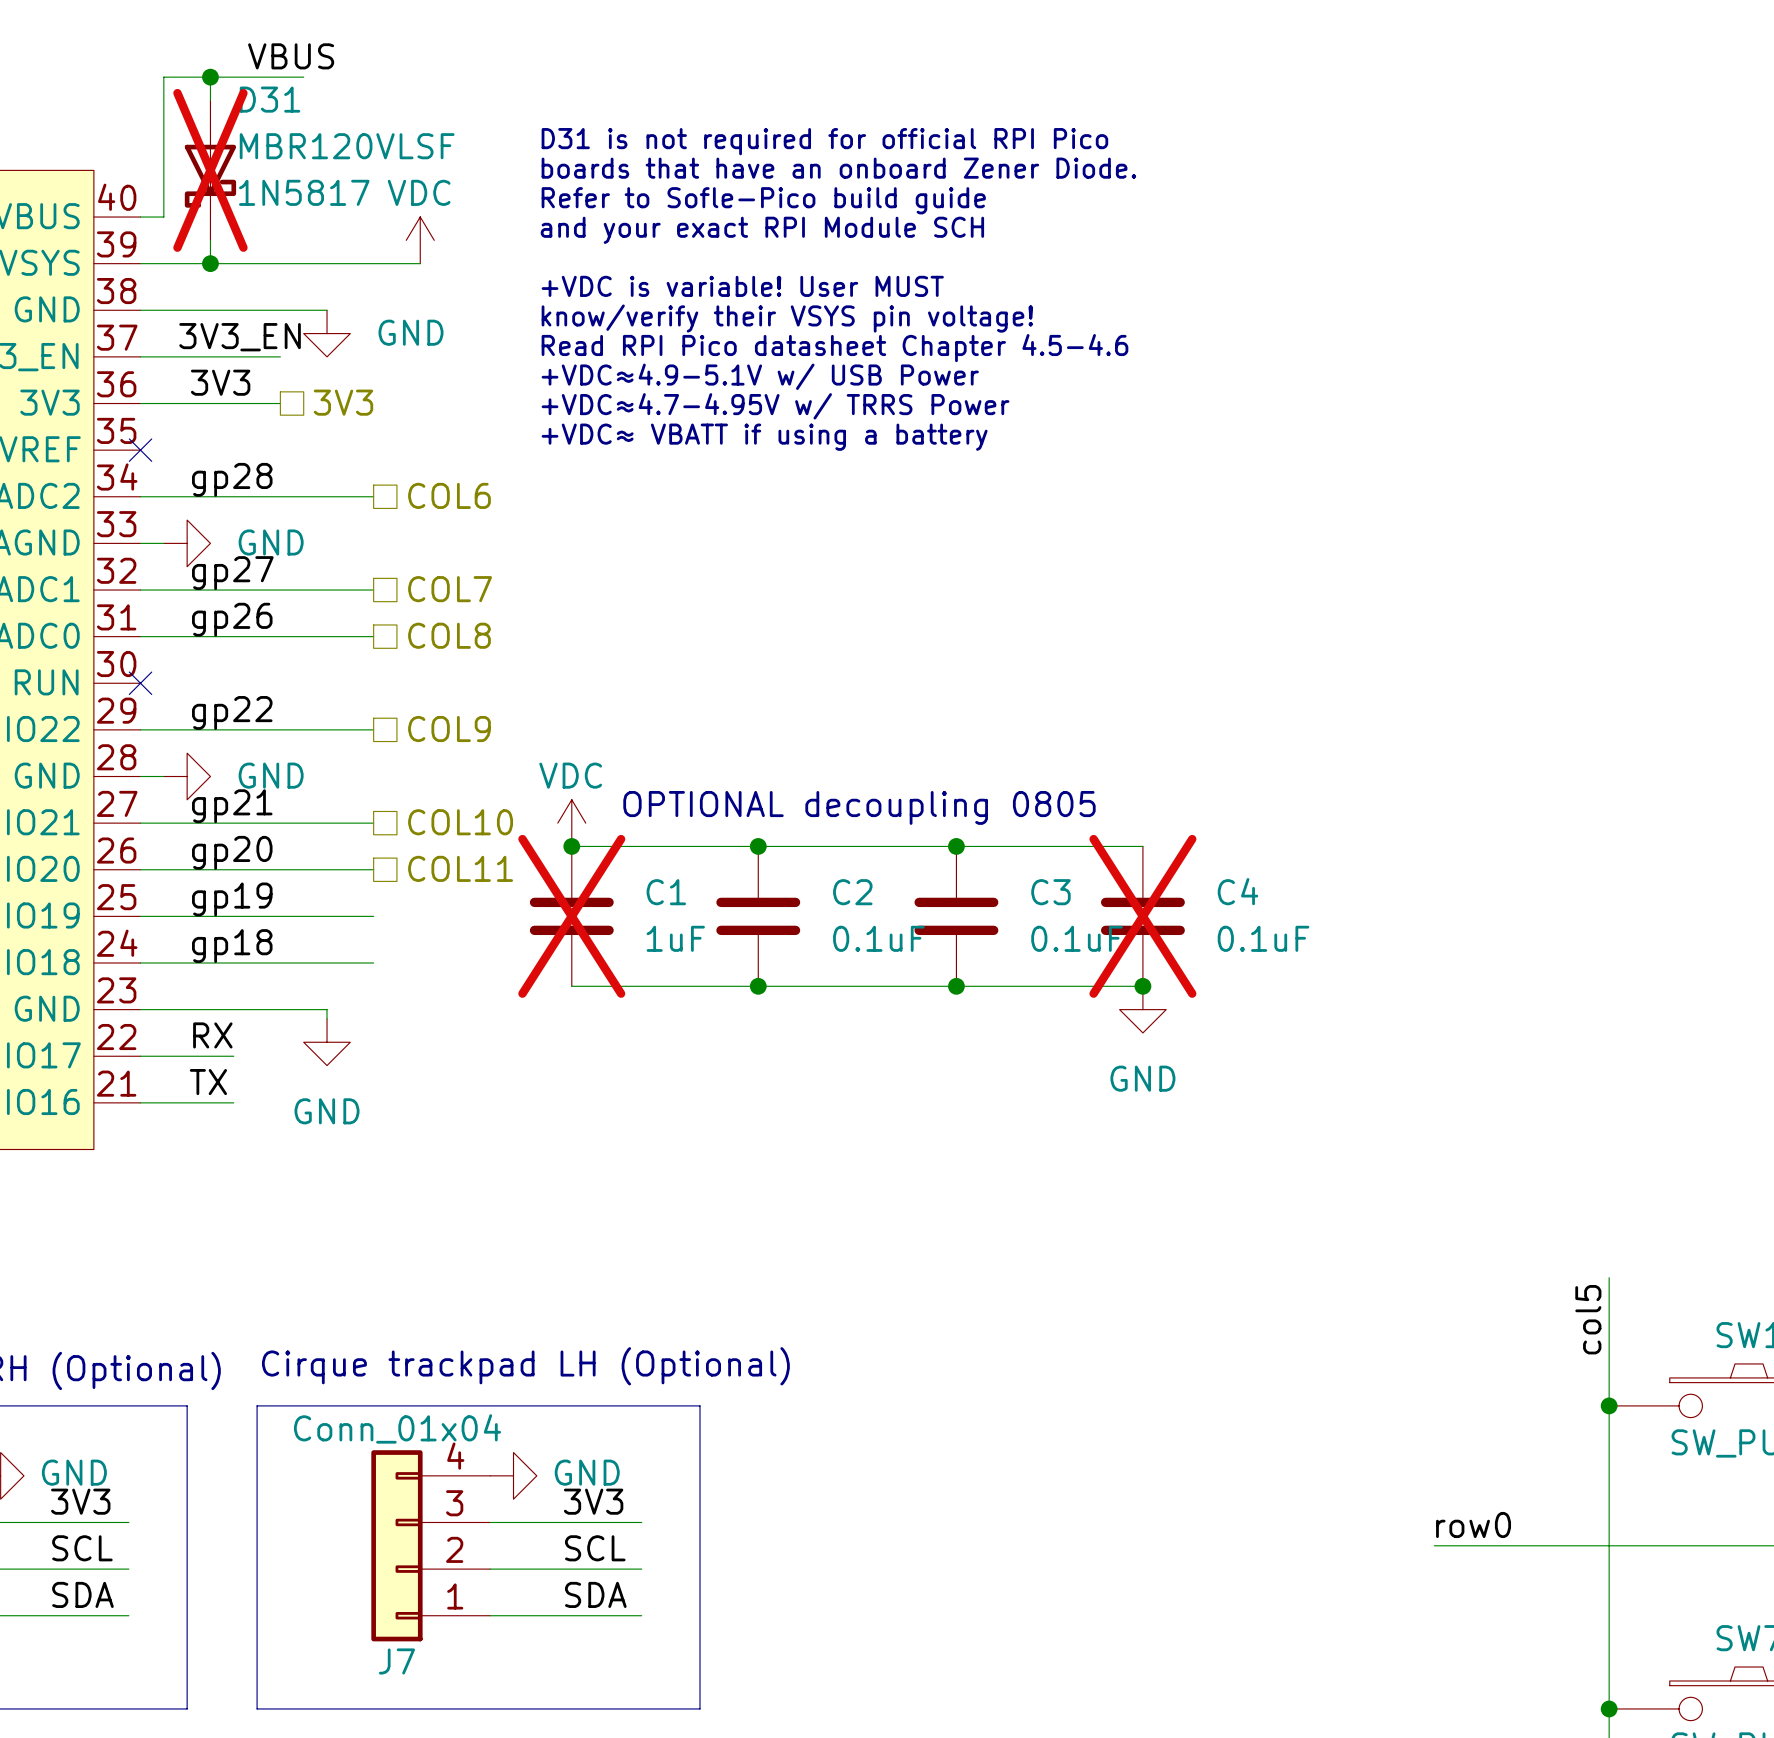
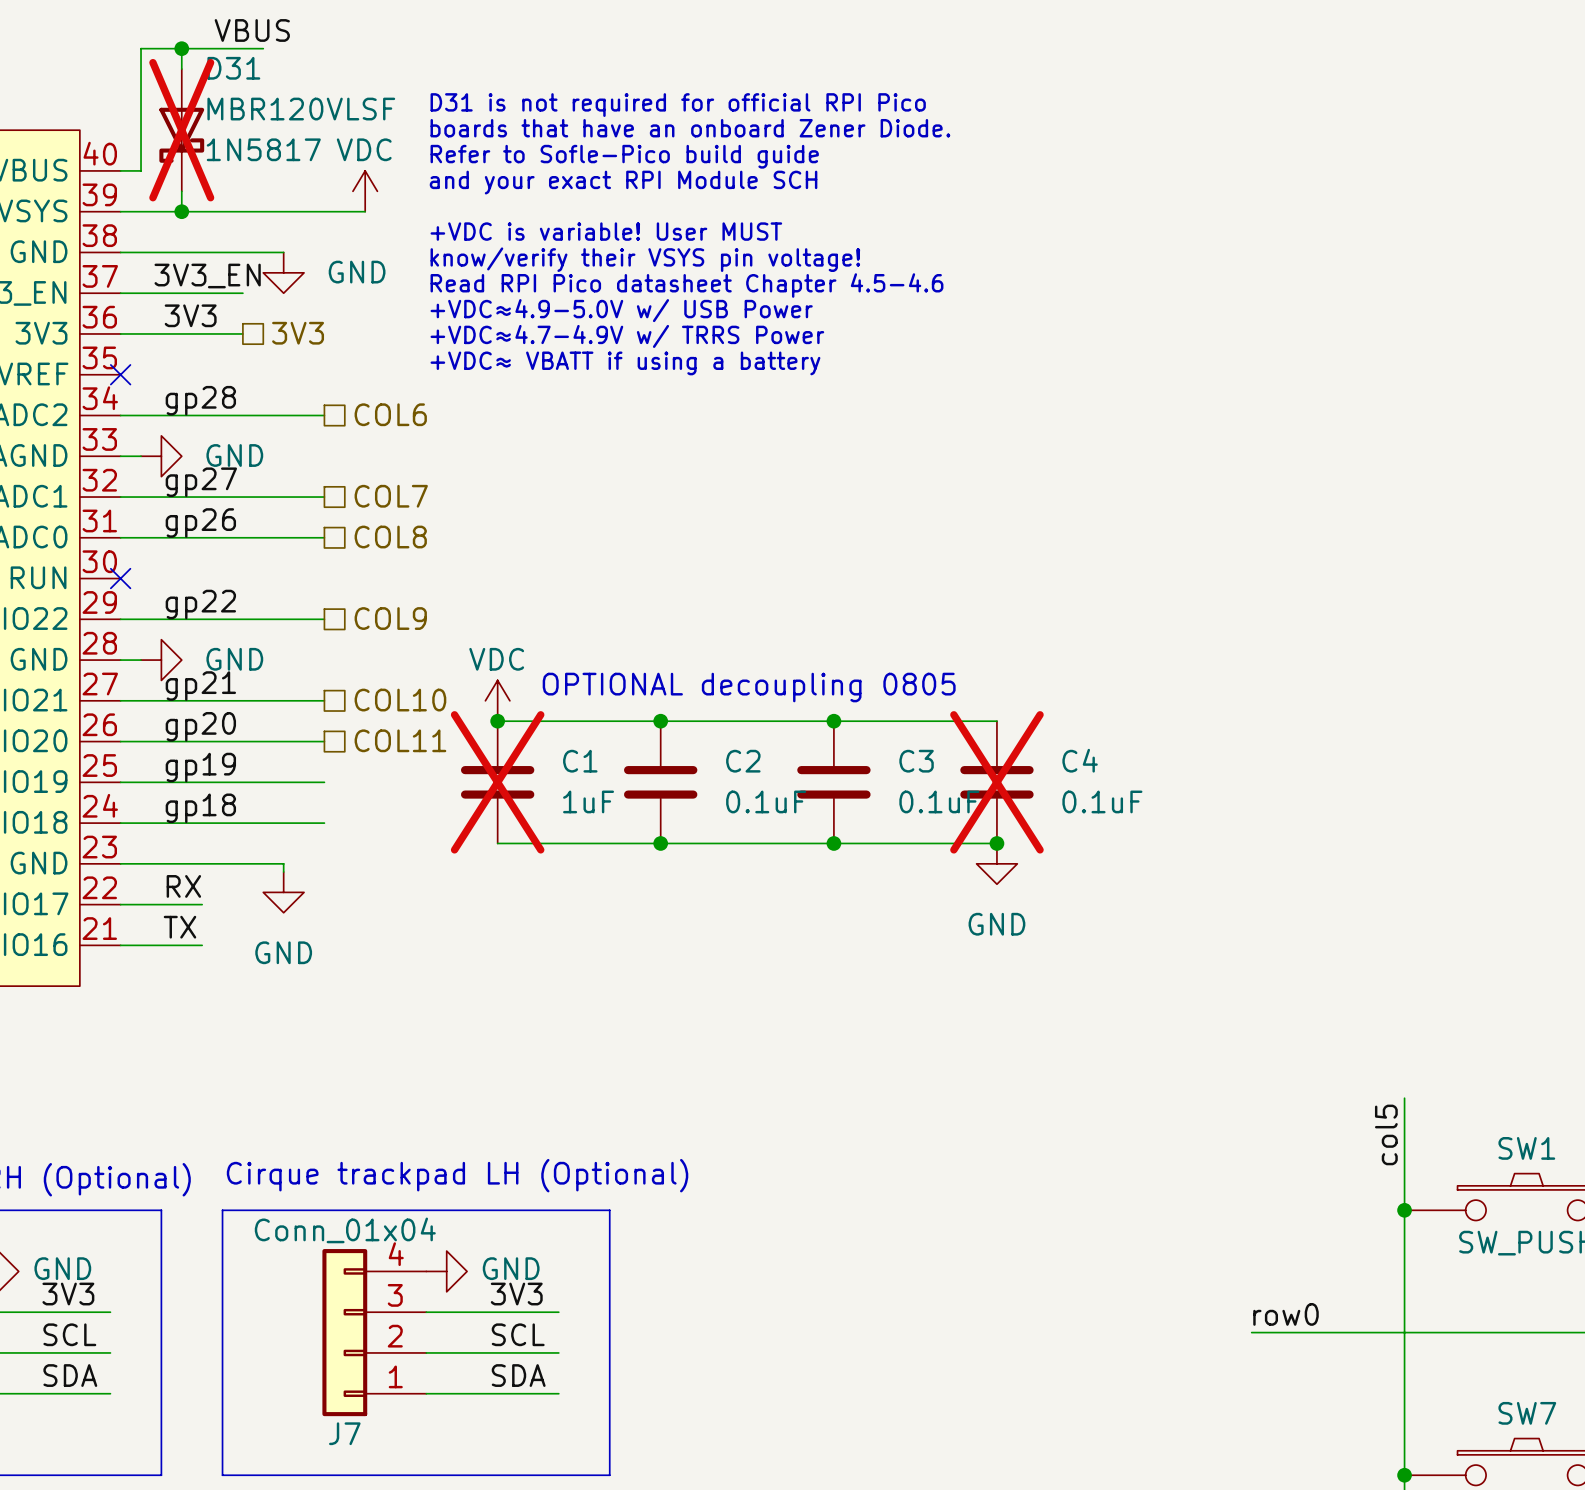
text position: D31 is not required for official RPI Pico (824, 141) -> D31 is not required for official RPI Pico (678, 105)
text position: boards that have an onboard Zener Diode. (838, 168) -> boards that have an onboard Zener Diode. (690, 128)
text position: Refer to Sofle-Pico build guide (763, 200) -> Refer to Sofle-Pico build guide (624, 156)
text position: and your exact RPI Module SCH (762, 230) -> and your exact RPI Module SCH (623, 182)
text position: +VDC is variable! User MUST (742, 286) -> +VDC is variable! User MUST (606, 231)
text position: know/verify their VSYS pin voltage! (787, 318) -> know/verify their VSYS pin voltage! (645, 259)
text position: Read RPI Pico datasheet Chapter 4.5-4.6 (834, 348) -> Read RPI Pico datasheet Chapter 4.5-4.6 (686, 285)
text: none -> +VDC≈4.9-5.0V w/ USB Power (621, 310)
text: +VDC≈4.9-5.1V w/ USB Power (760, 376) -> none
text: none -> +VDC≈4.7-4.9V w/ TRRS Power (627, 336)
text: +VDC≈4.7-4.95V w/ TRRS Power (775, 406) -> none
text position: +VDC≈ VBATT if using a battery (764, 437) -> +VDC≈ VBATT if using a battery (625, 363)

